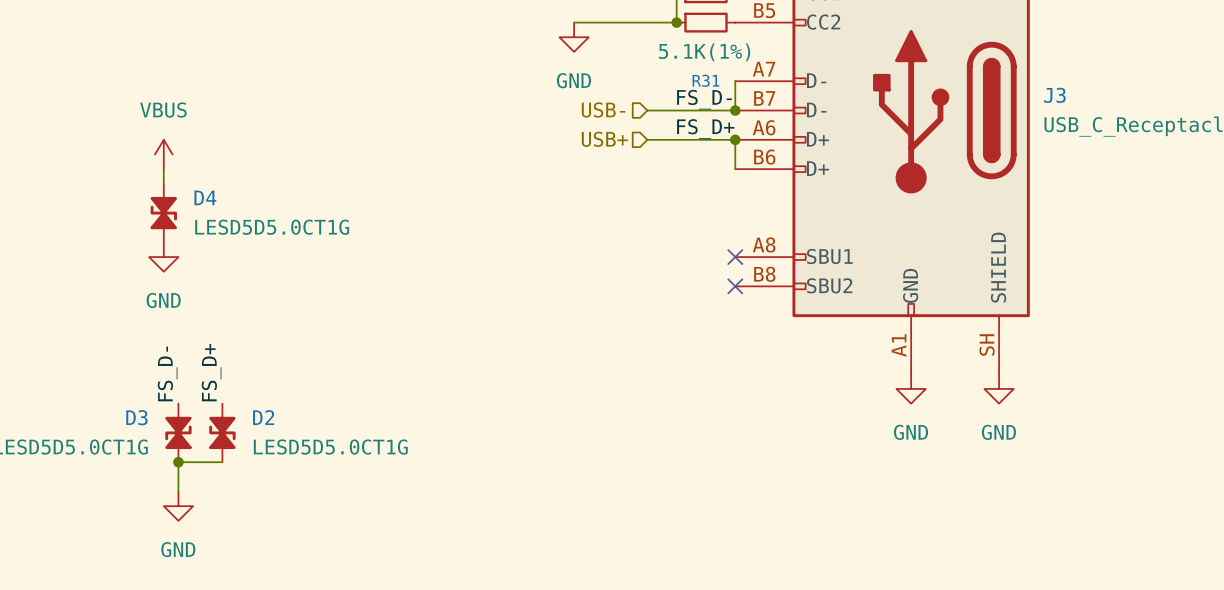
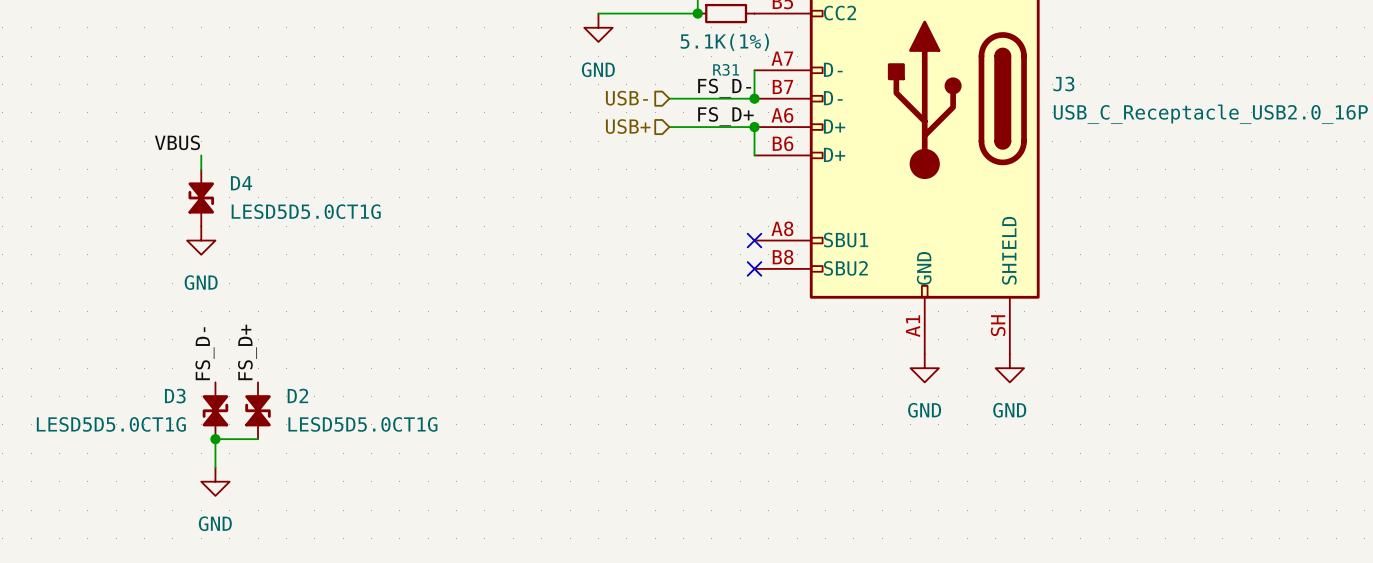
power symbol: VBUS (163, 154) -> none
label: none -> VBUS (177, 142)

